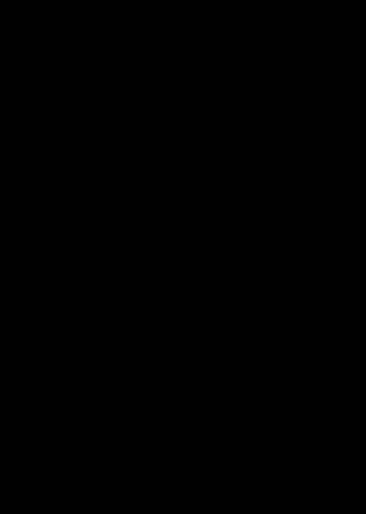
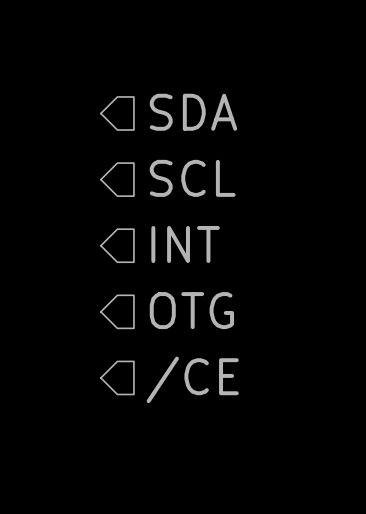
hierarchical label: none -> SDA (193, 112)
hierarchical label: none -> SCL (192, 178)
hierarchical label: none -> INT (185, 244)
hierarchical label: none -> OTG (191, 310)
hierarchical label: none -> /CE (192, 379)

